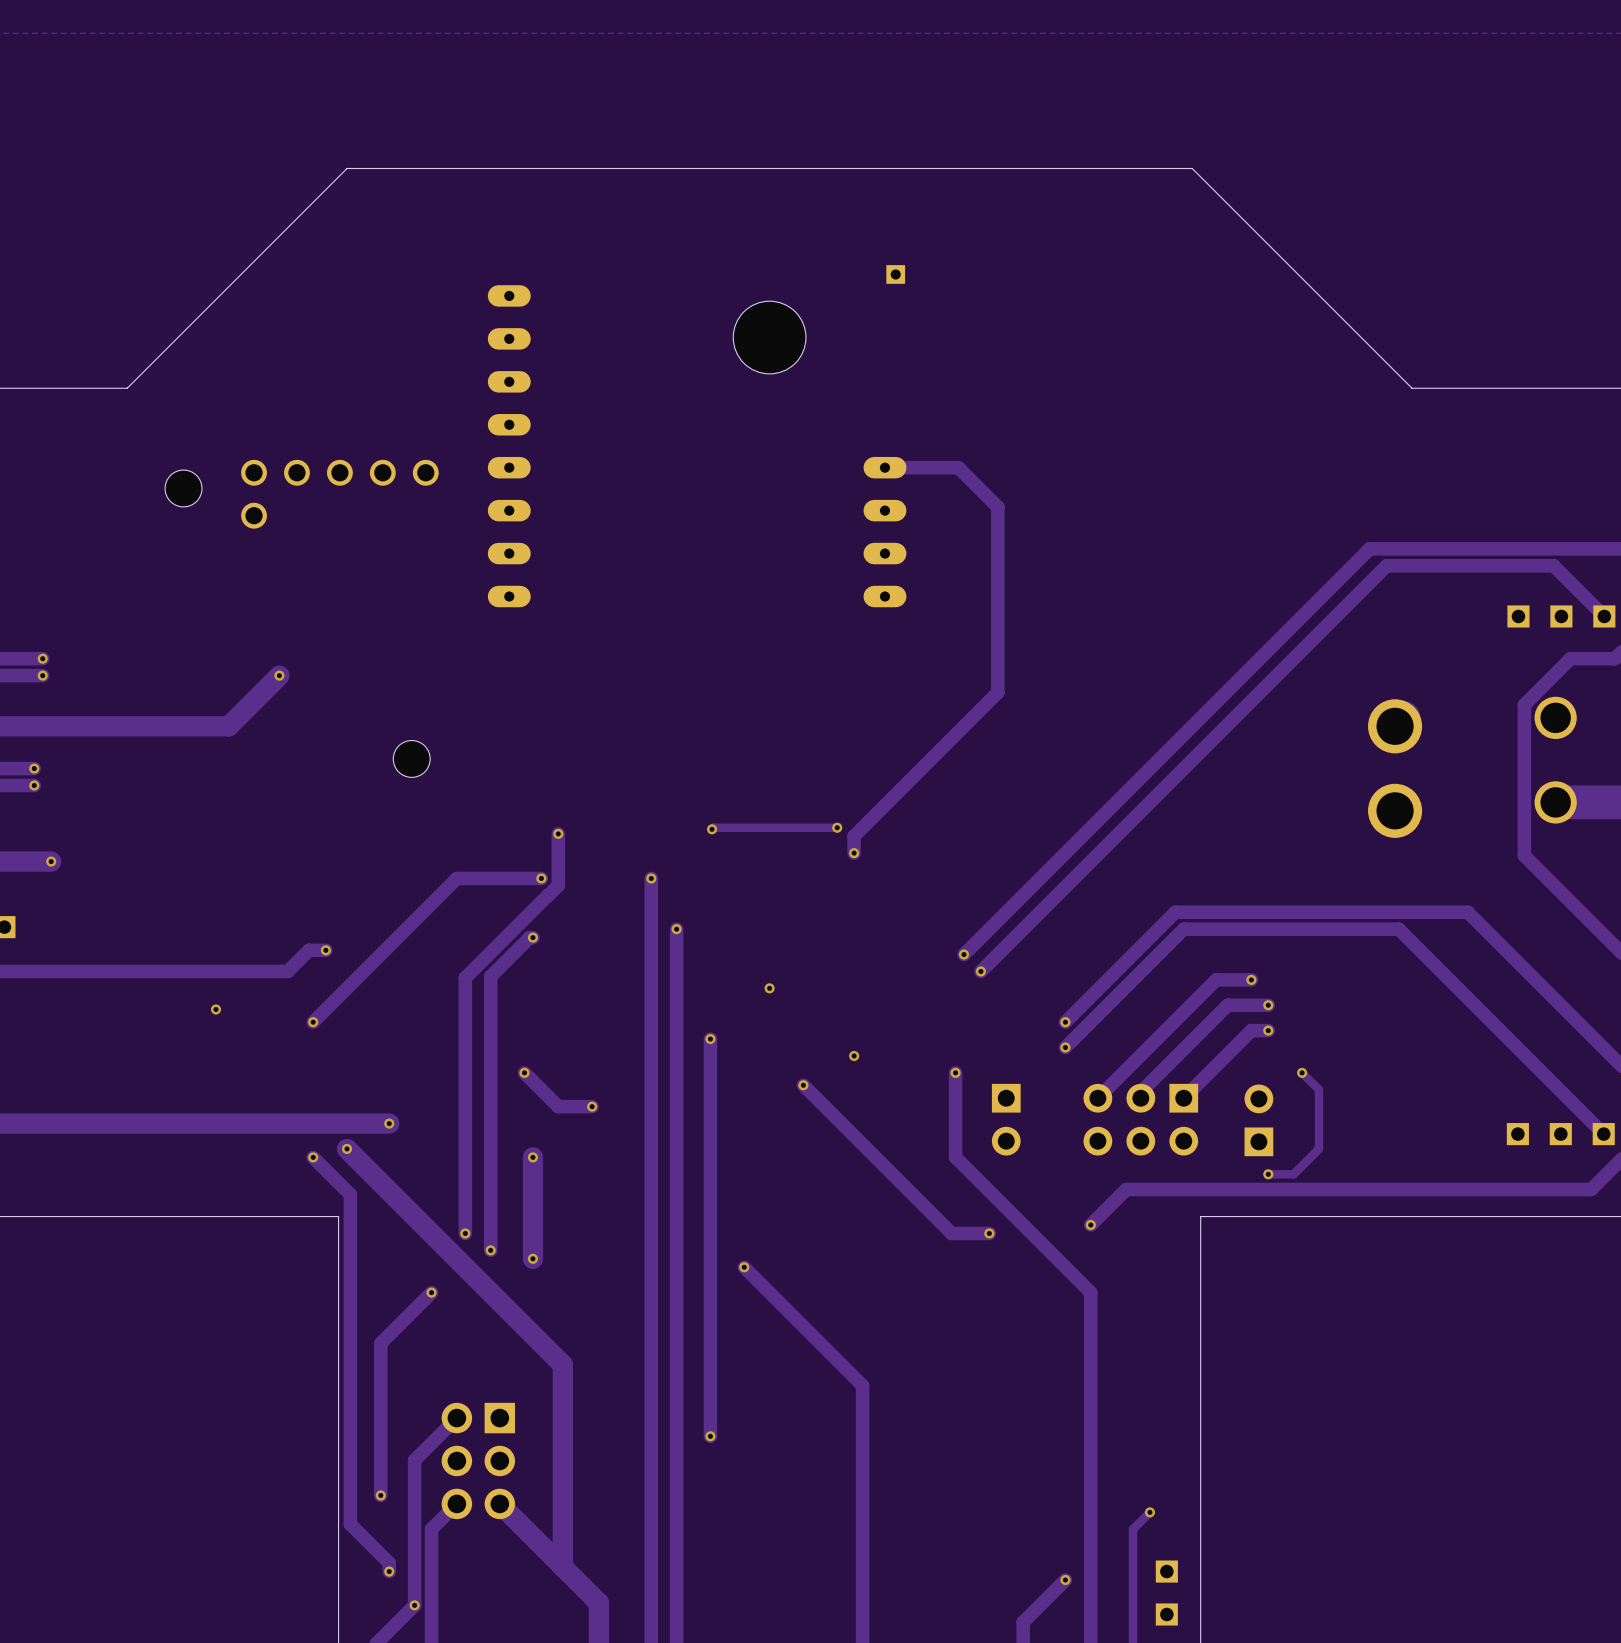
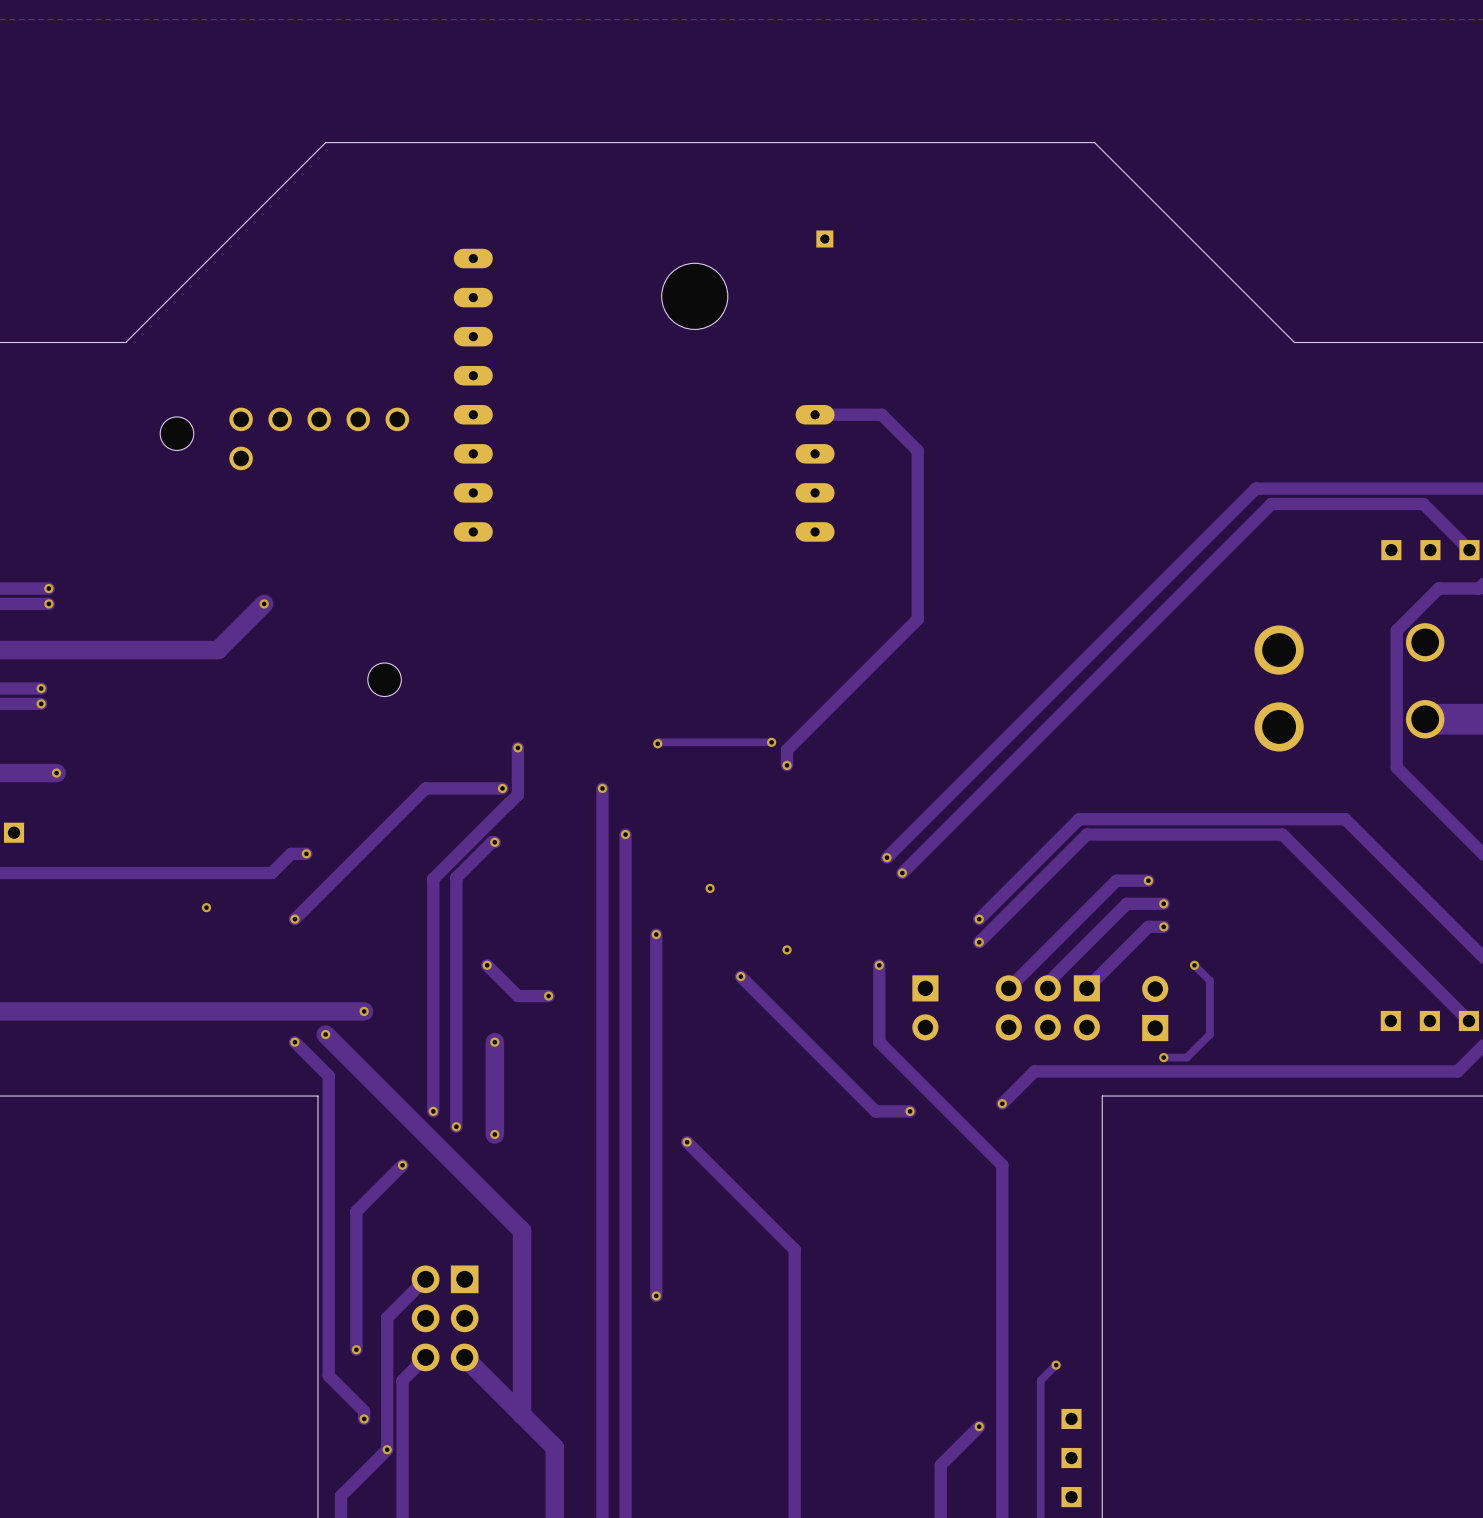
part position: (769, 337) -> (694, 296)

